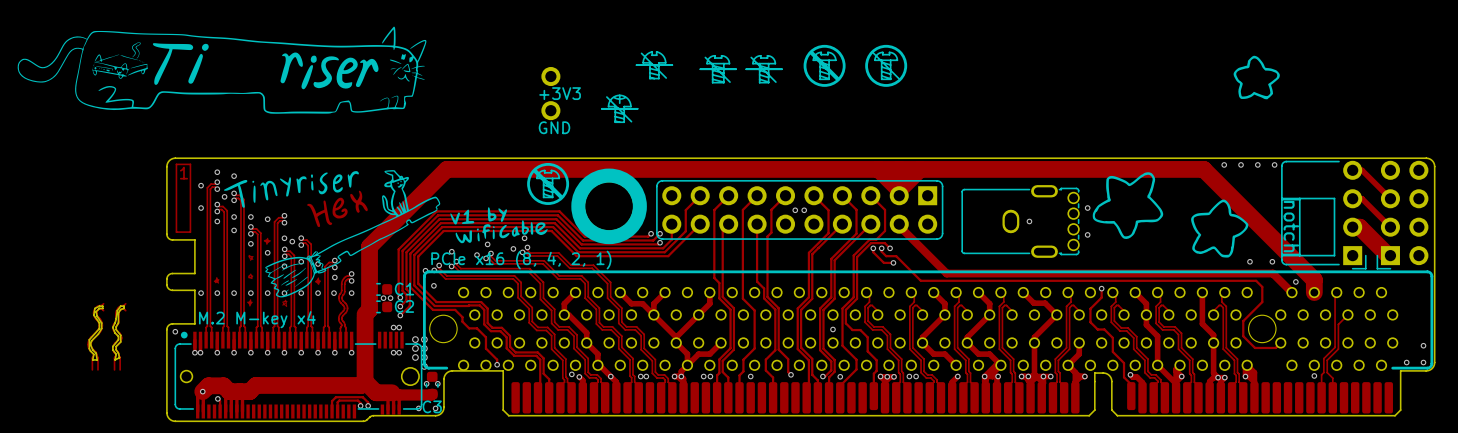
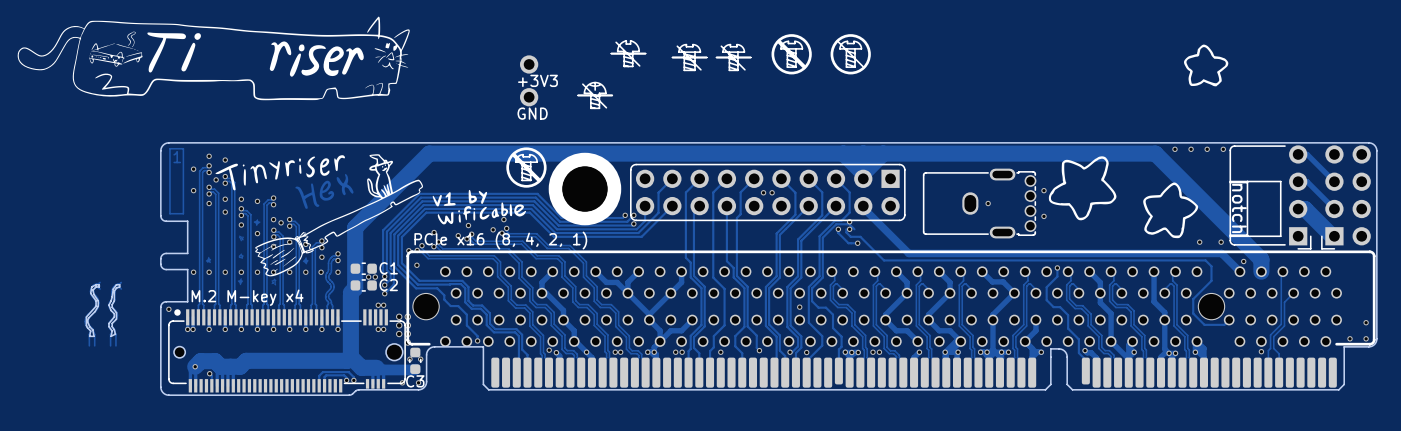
via: none -> (849, 221)
via: (881, 248) -> none
via: none -> (849, 229)
via: (890, 248) -> none

